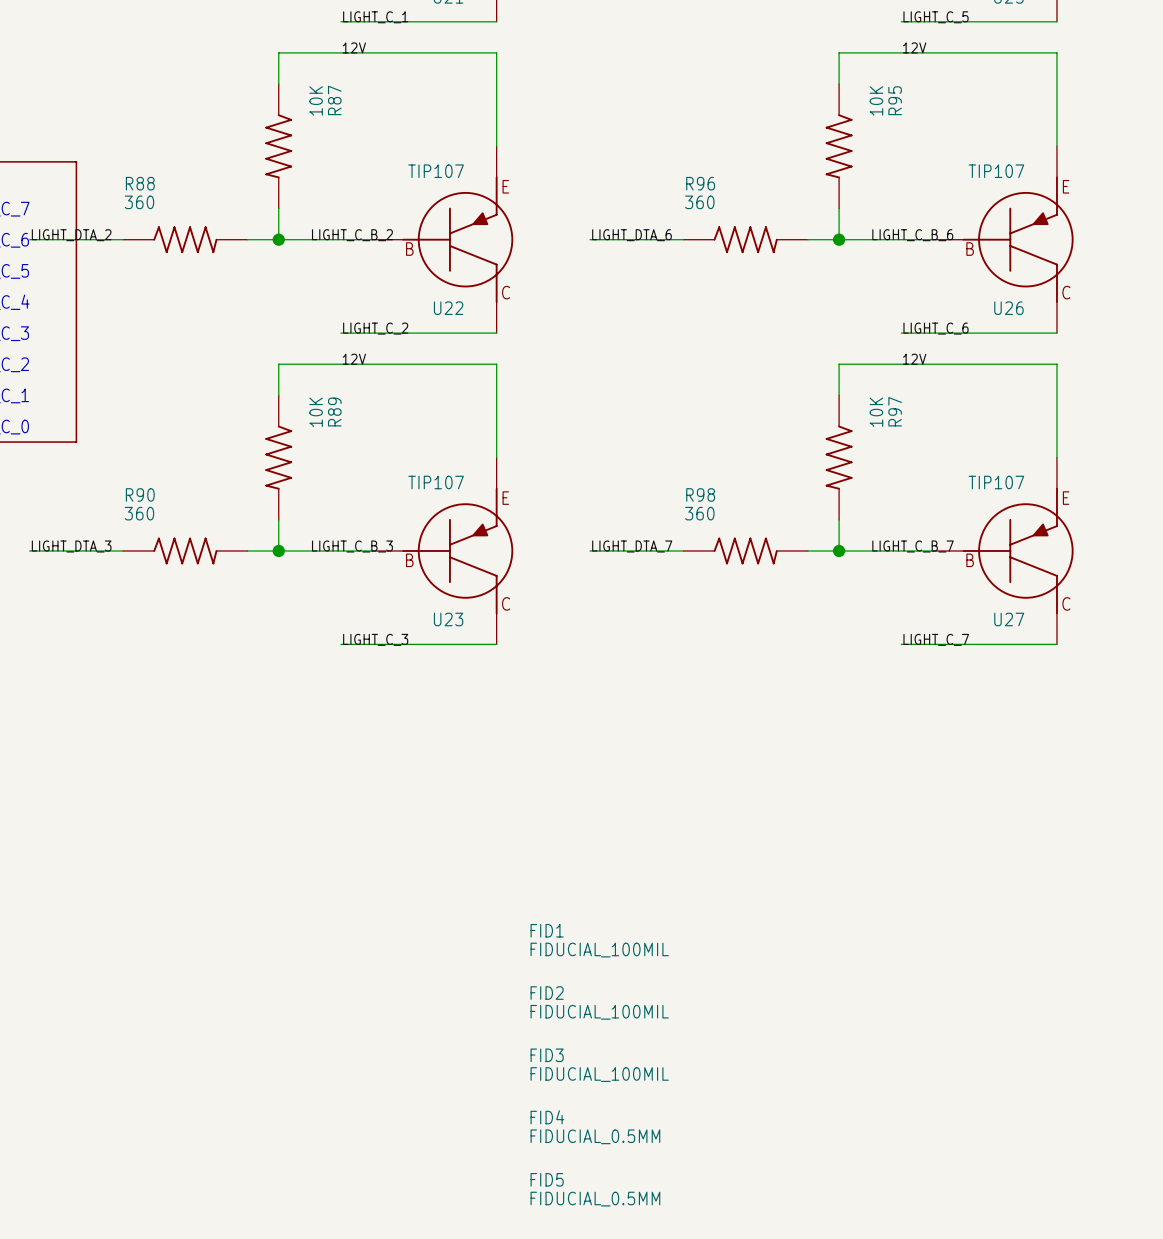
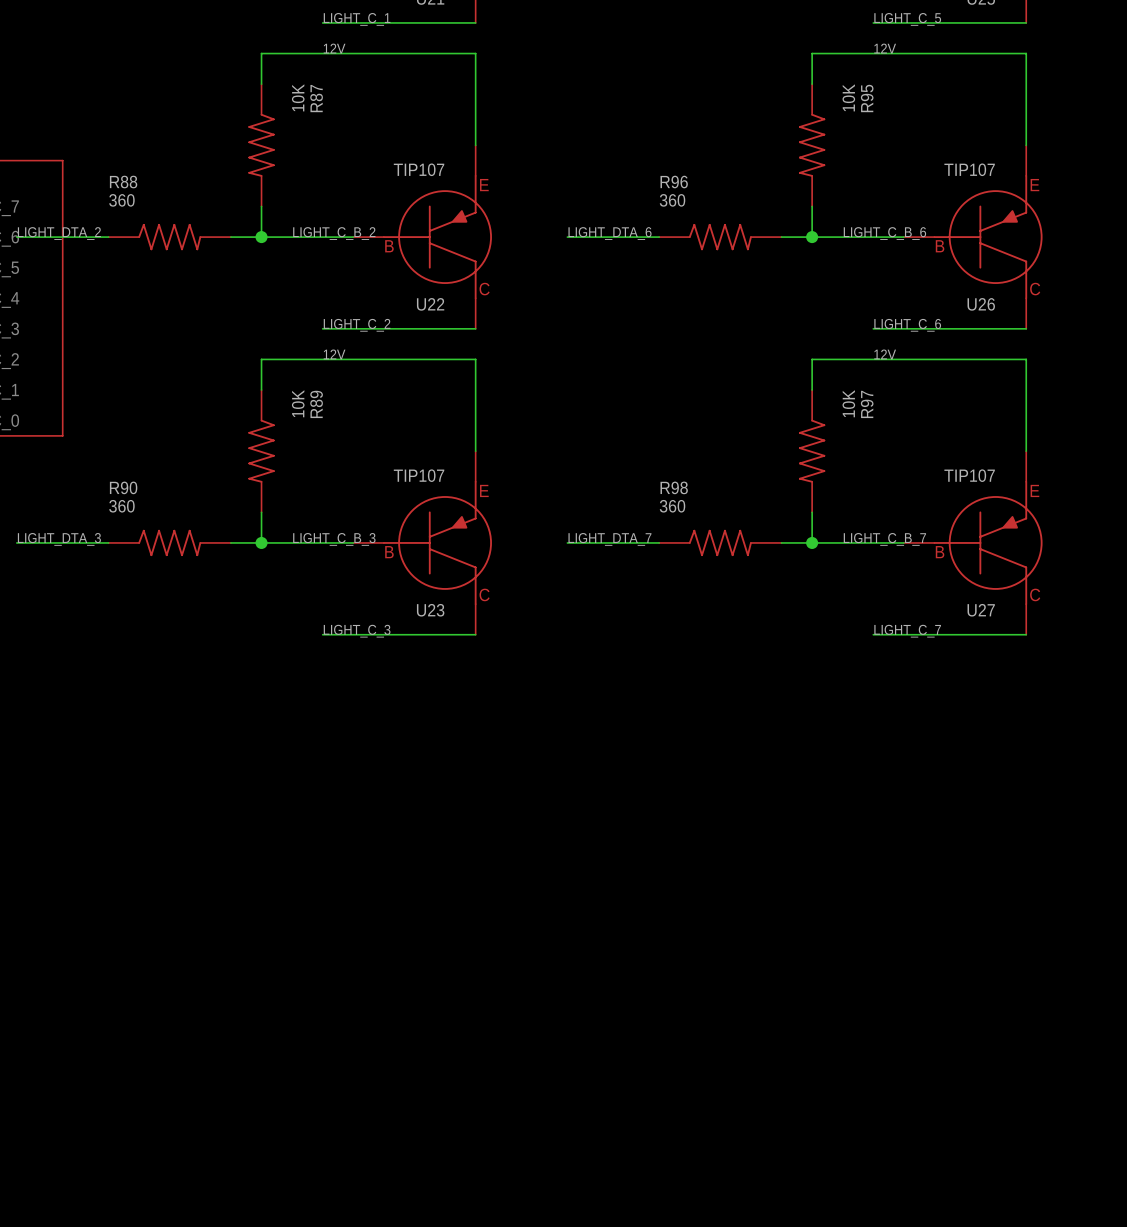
FID1: FIDUCIAL_100MIL (599, 940) -> none
FID2: FIDUCIAL_100MIL (599, 1002) -> none
FID3: FIDUCIAL_100MIL (599, 1065) -> none
FID4: FIDUCIAL_0.5MM (595, 1127) -> none
FID5: FIDUCIAL_0.5MM (595, 1189) -> none

